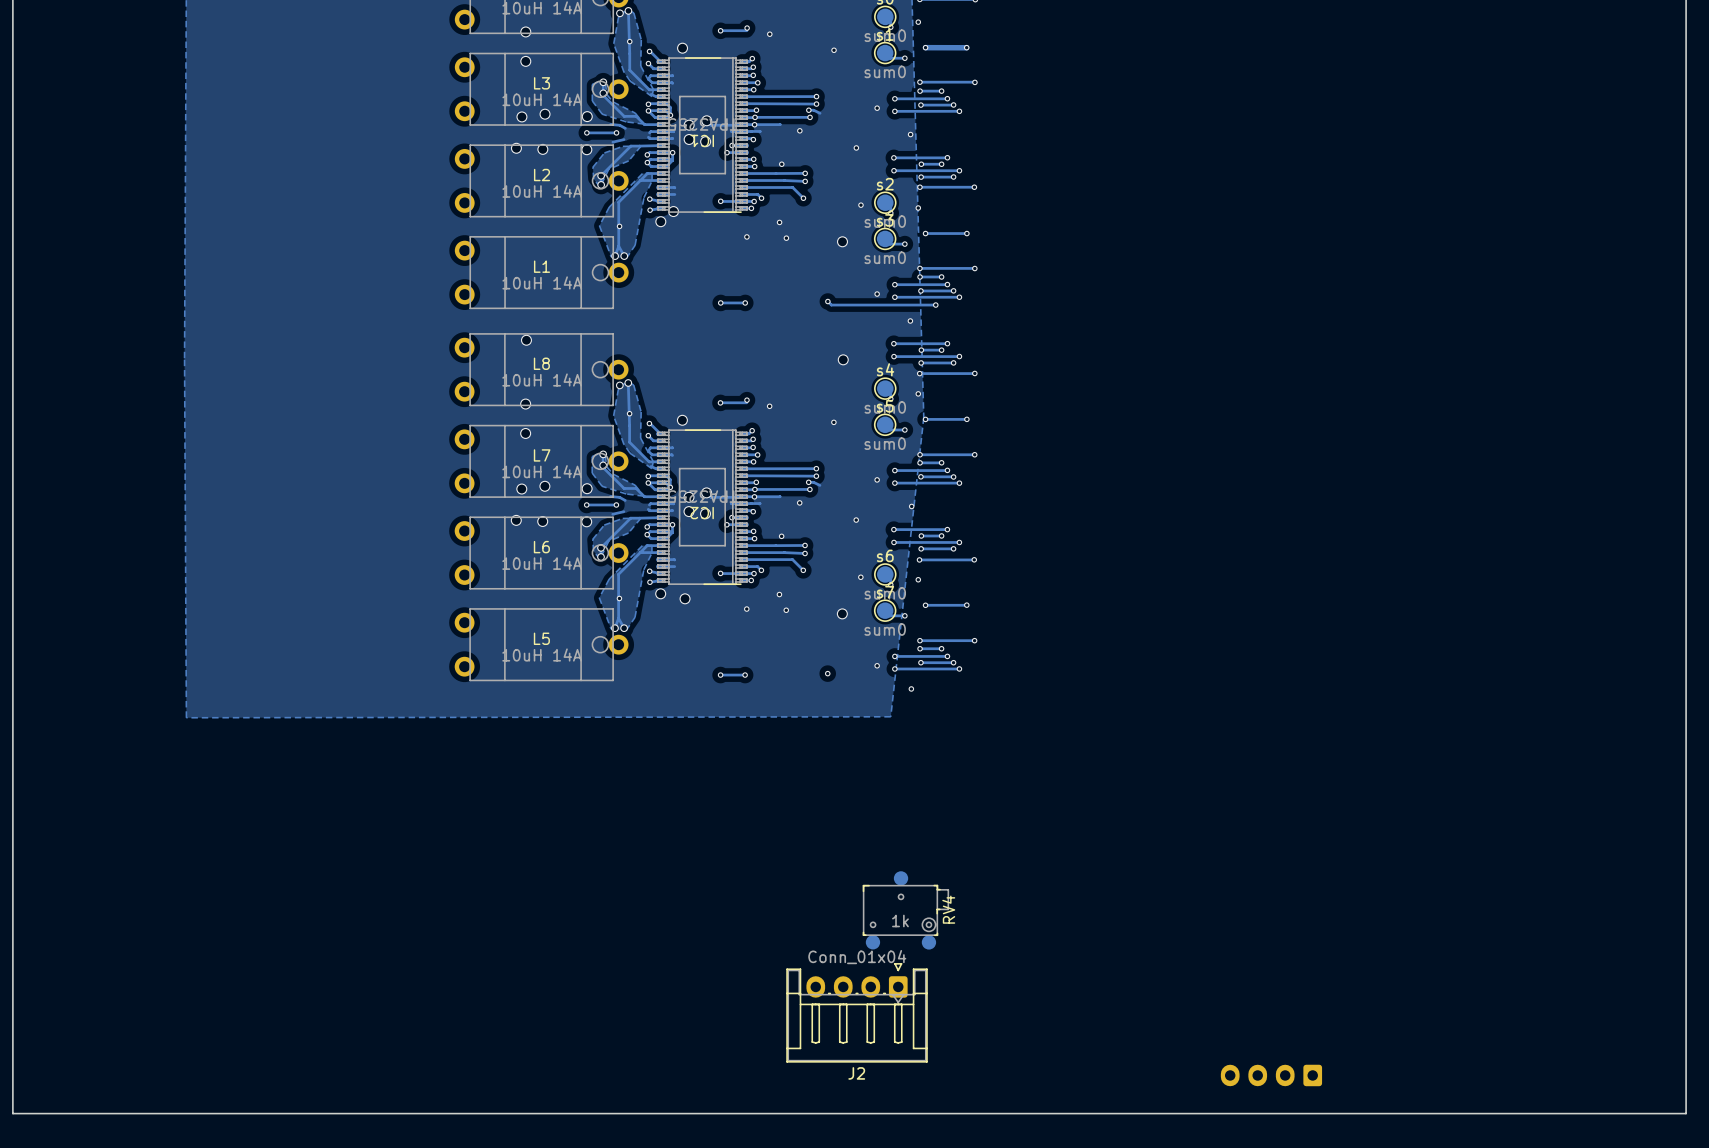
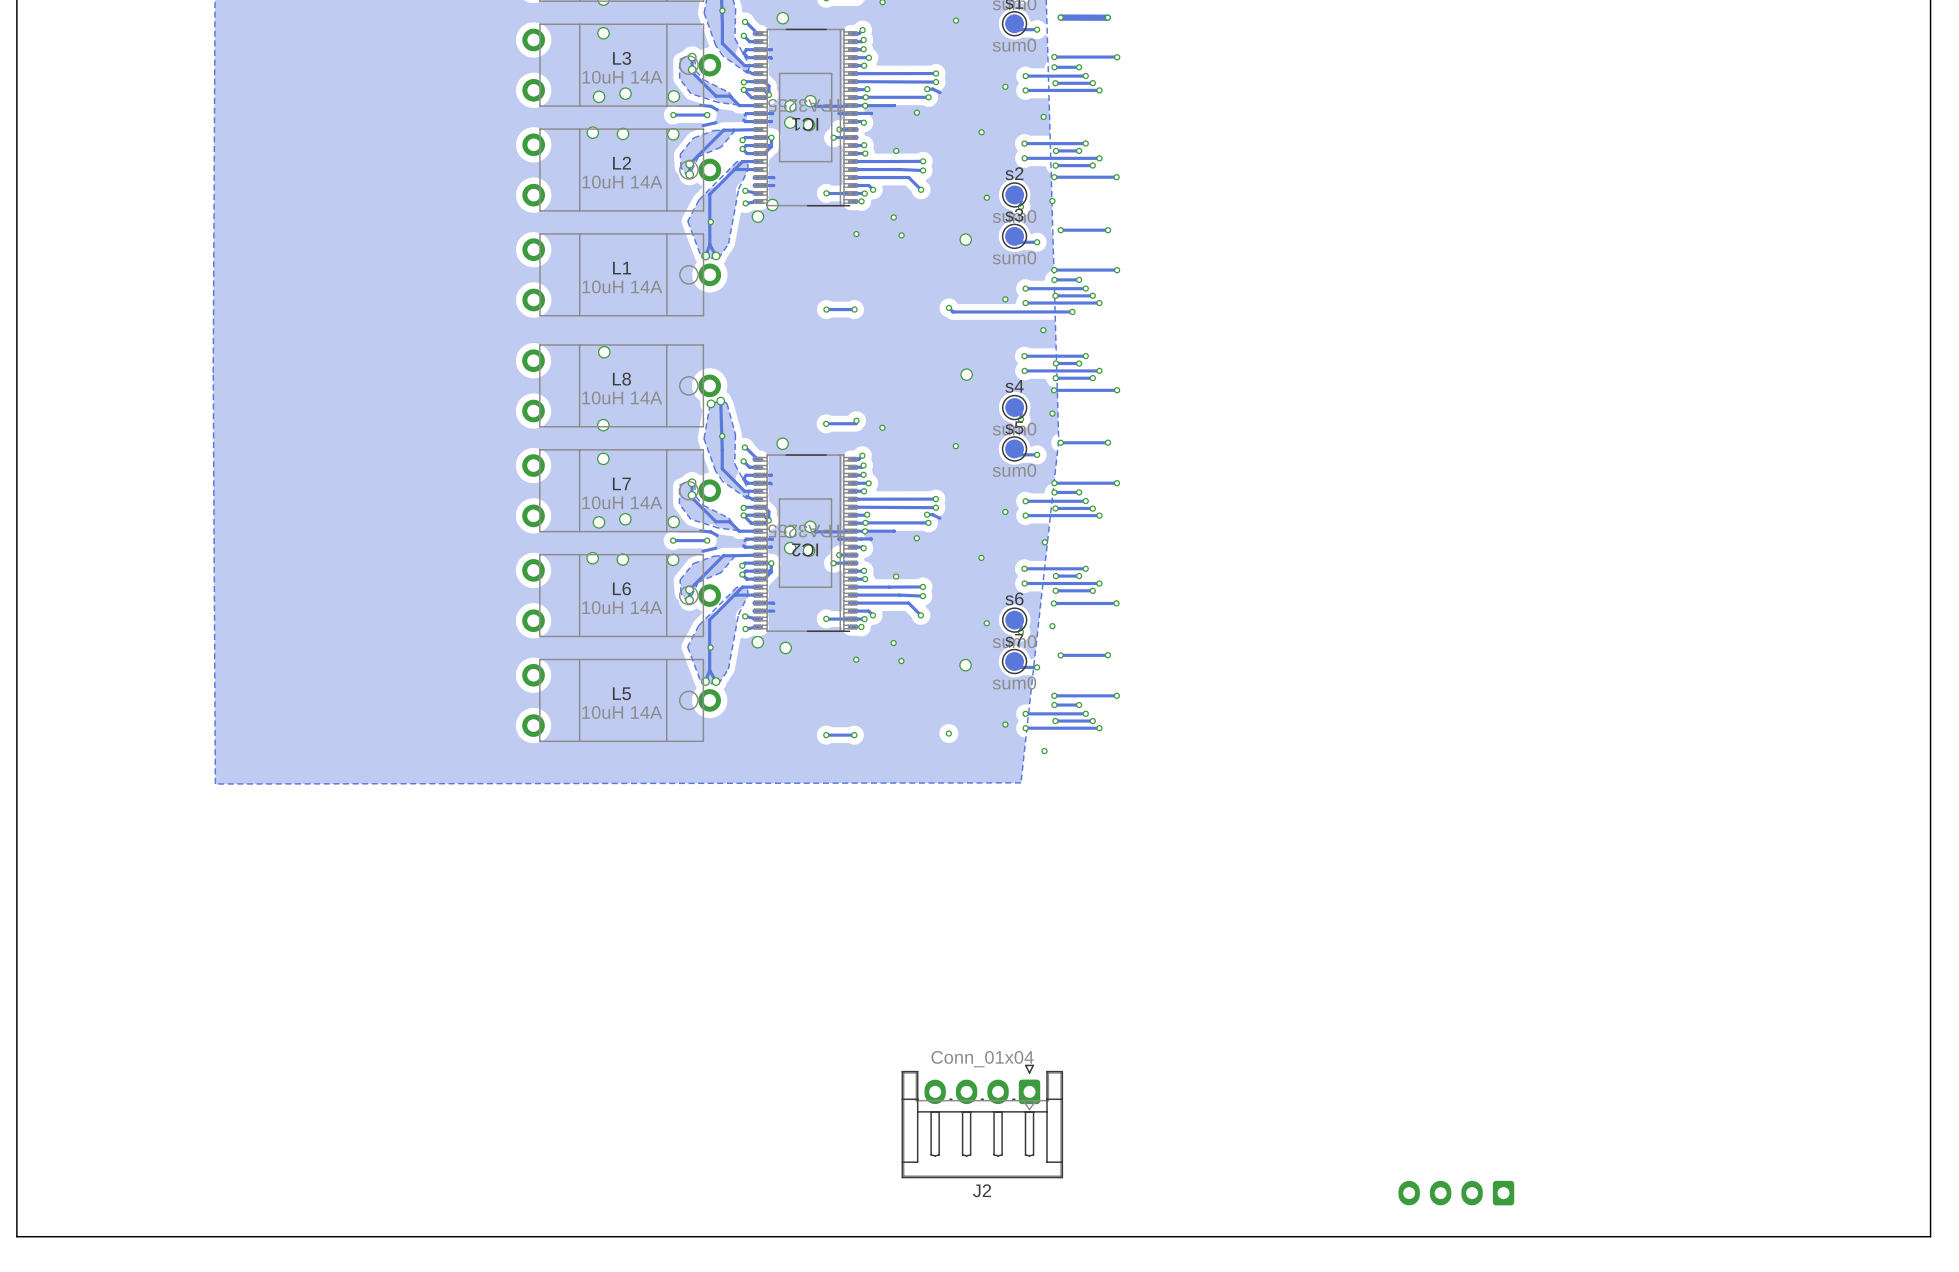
RV4: 1k (905, 910) -> none

